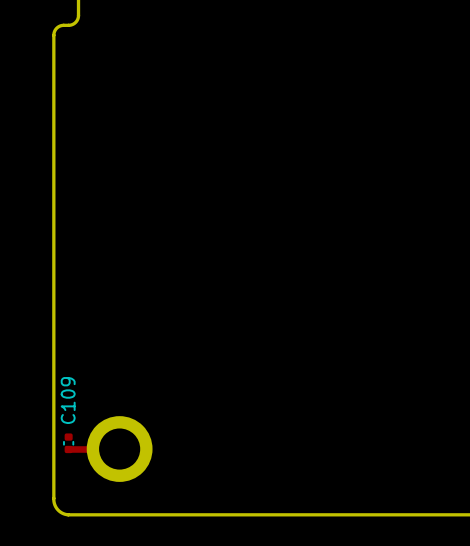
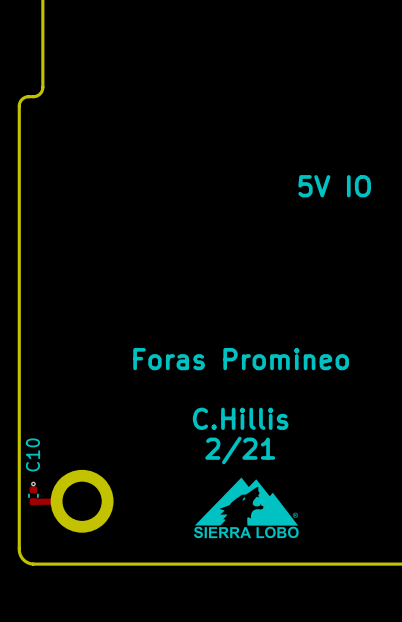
text: none -> 5V IO (334, 186)
text: none -> Foras Promineo (241, 359)
text: none -> C.Hillis (240, 418)
text: none -> 2/21 (240, 450)
C109 name: C109 (68, 400) -> C10 (32, 454)
drawing: none -> [193, 477, 299, 539]
via: none -> (33, 484)

